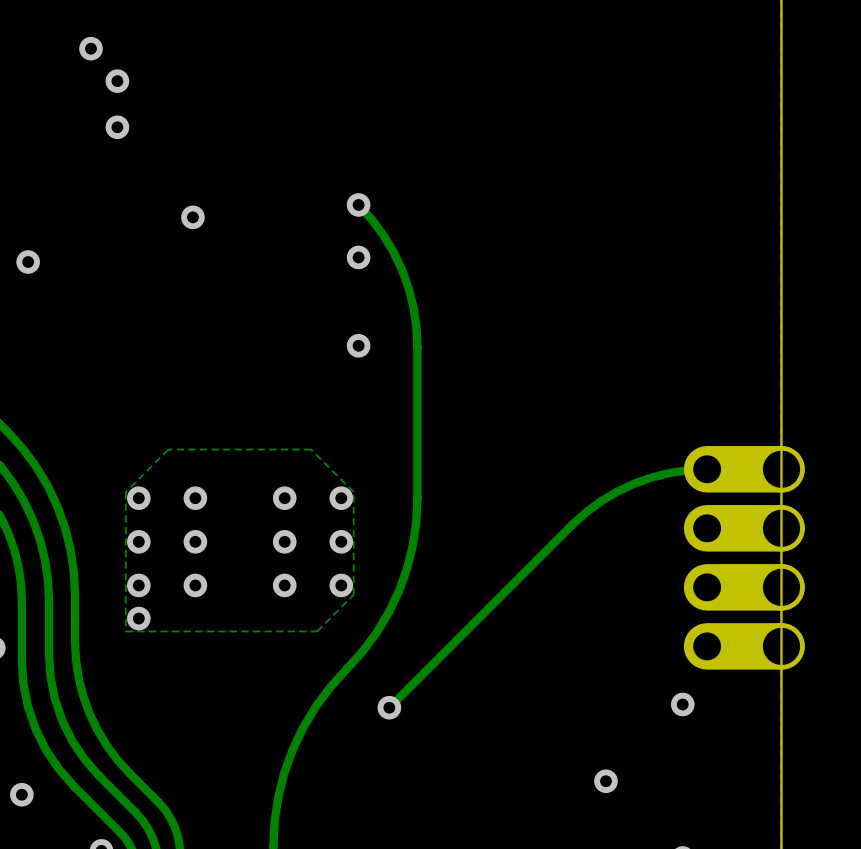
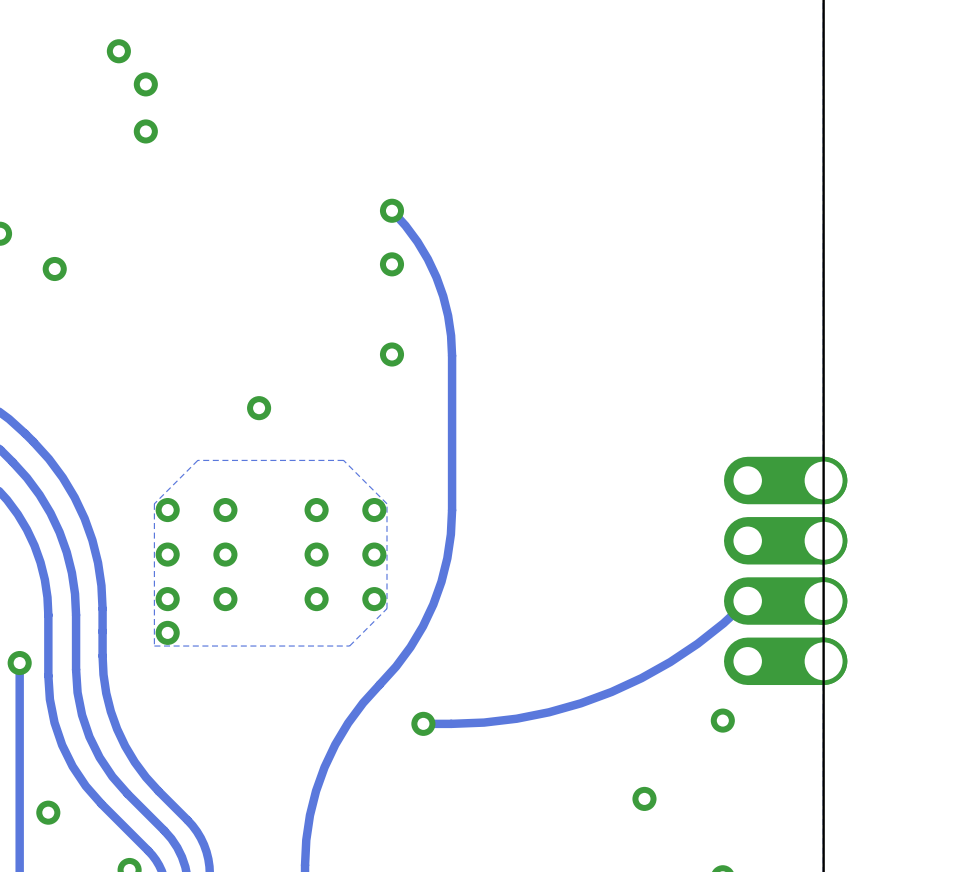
via position: (192, 217) -> (259, 408)
track: (707, 469) (669, 472) (633, 483) (600, 501) (585, 512) (389, 707) -> (747, 601) (697, 643) (670, 662) (611, 691) (549, 712) (516, 718) (484, 722) (423, 723)

